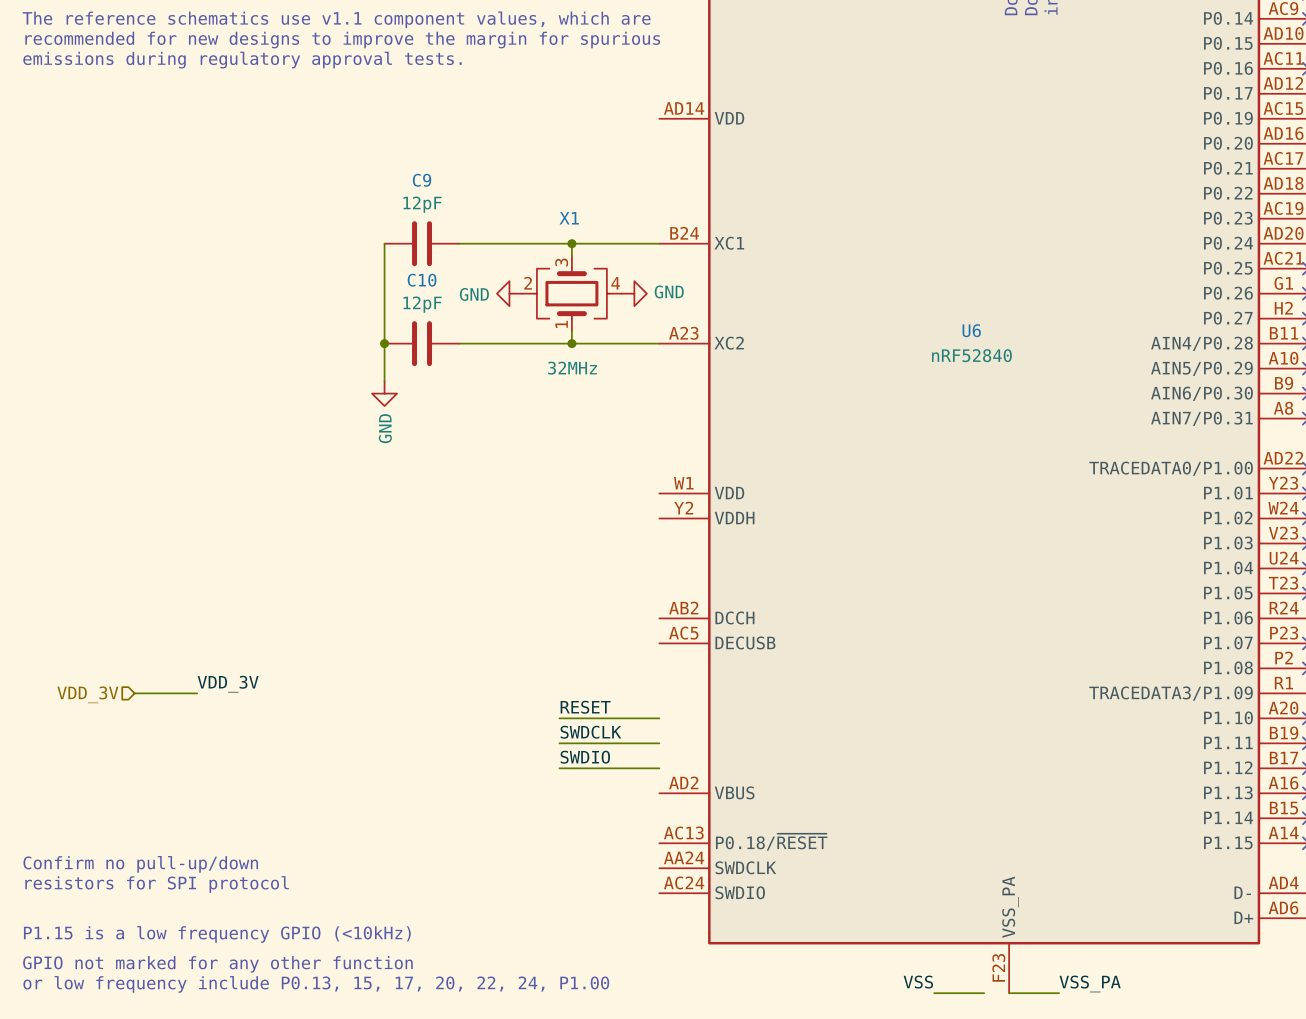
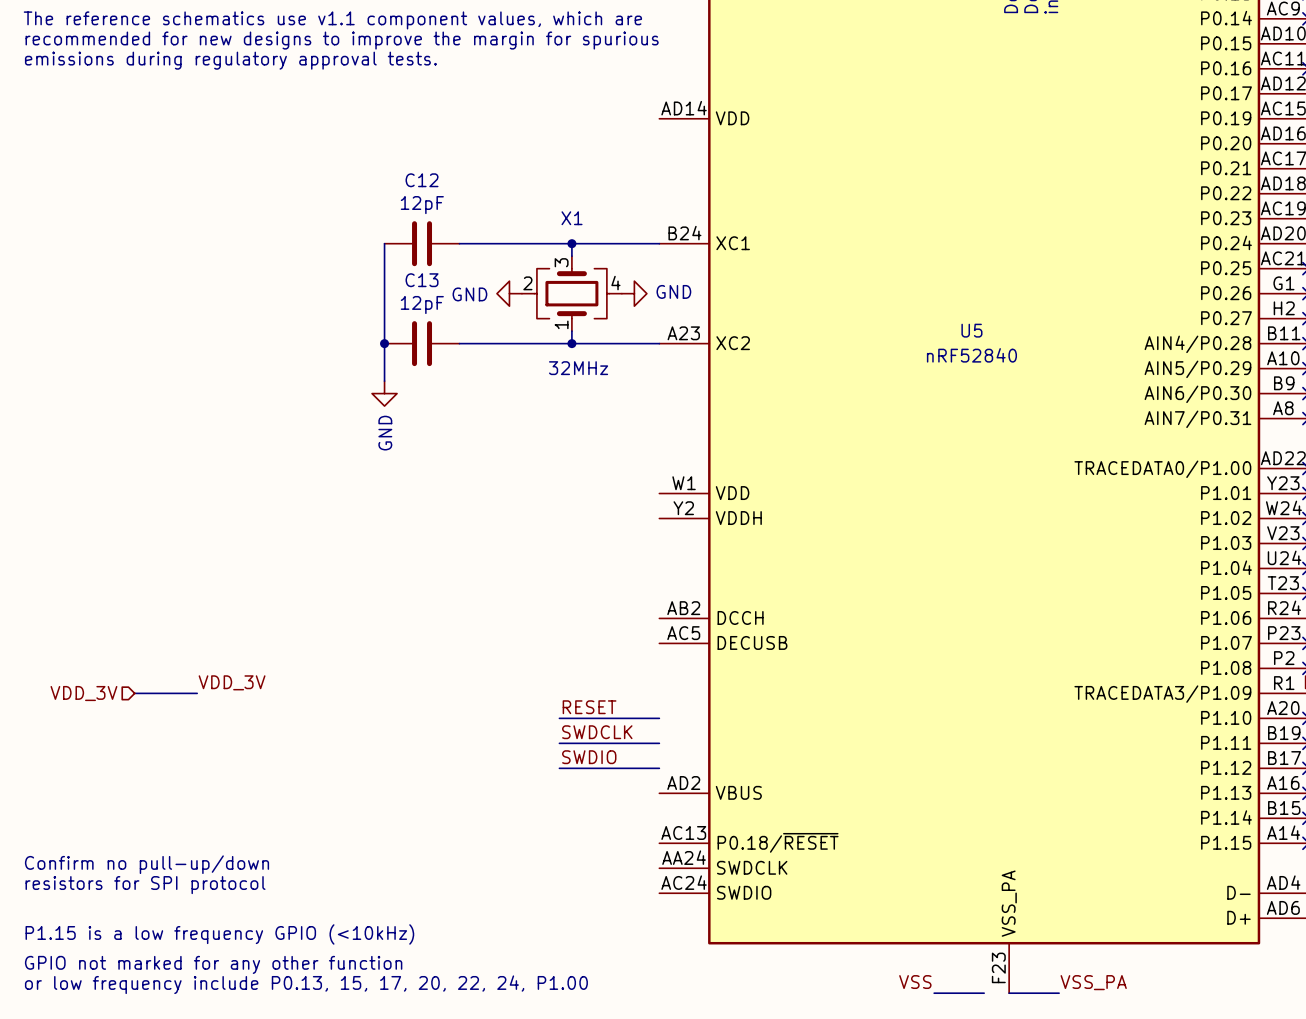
C9 name: C9 (422, 180) -> C12 (422, 180)
C10 name: C10 (422, 280) -> C13 (422, 280)
U6 name: U6 (971, 330) -> U5 (971, 330)

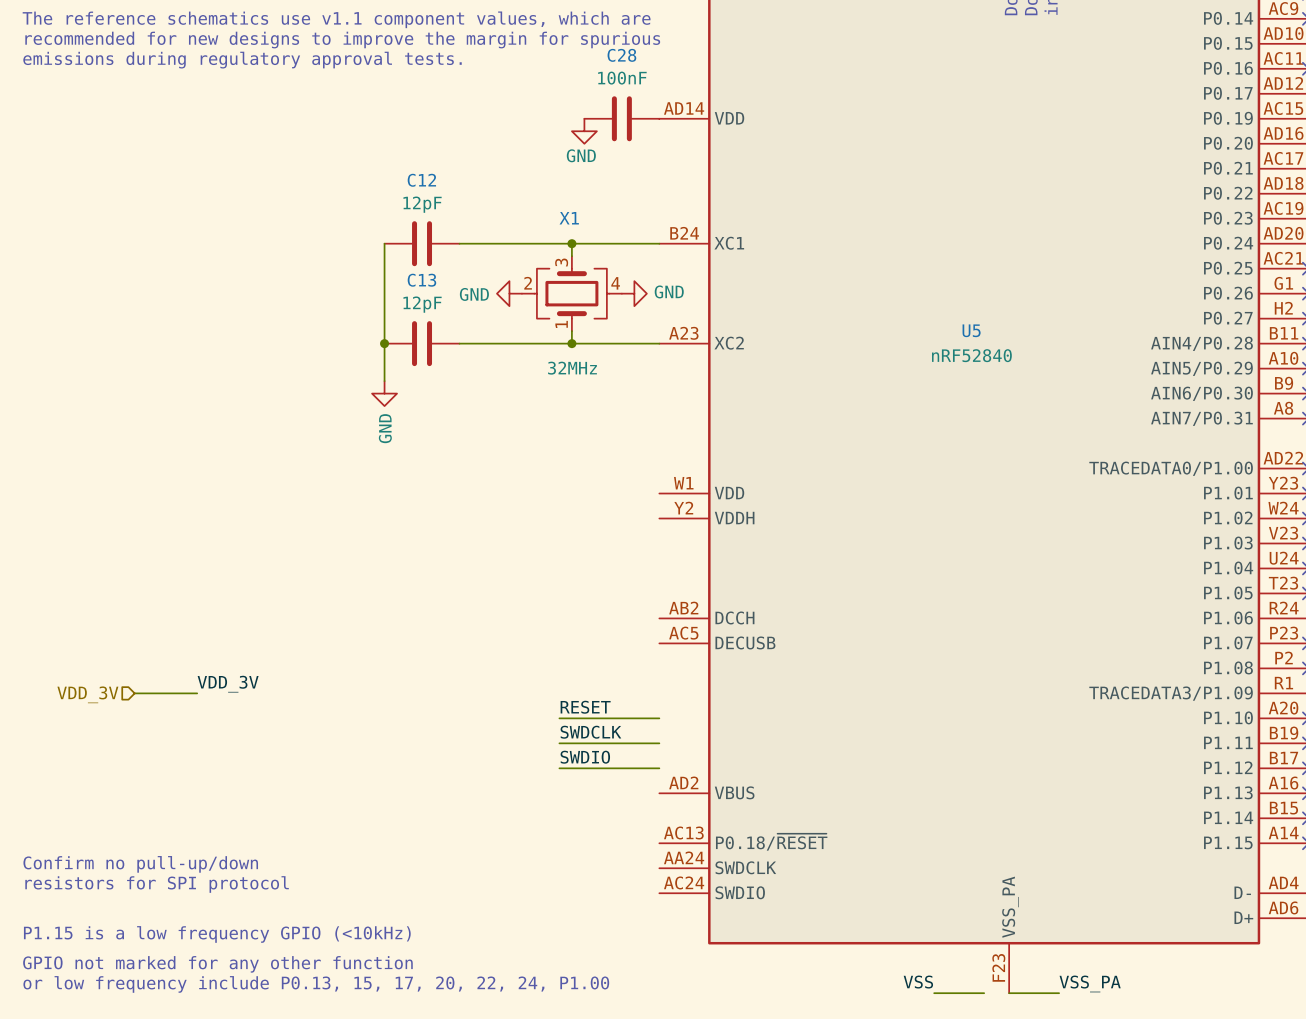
C28: none -> 100nF (621, 118)
power symbol: none -> GND (584, 131)

